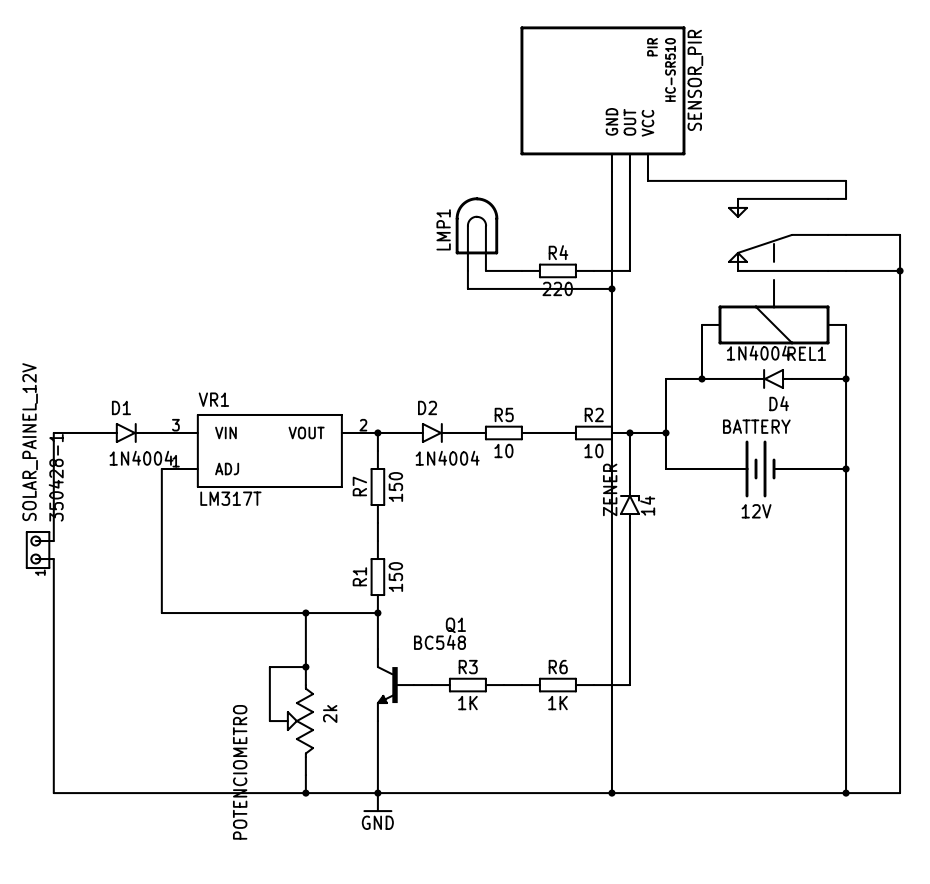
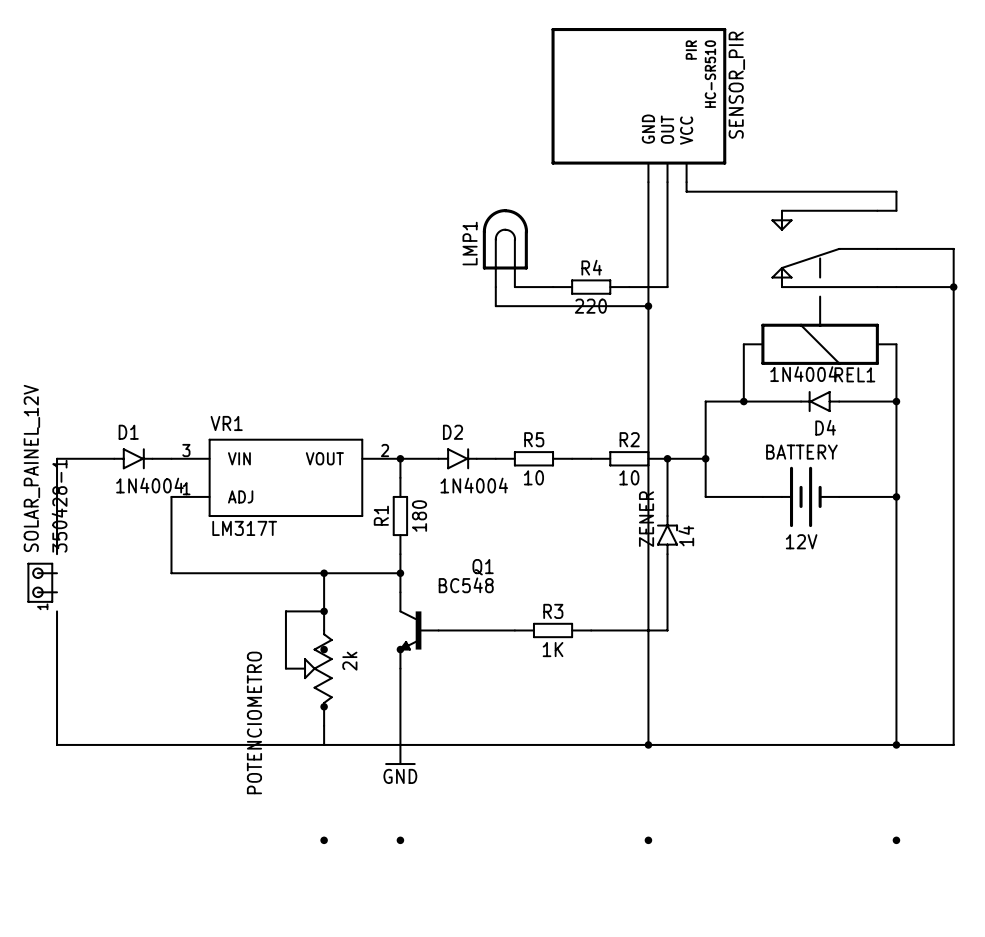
R7 name: R7 (359, 486) -> R1 (381, 515)
R7 value: 150 (395, 487) -> 180 (419, 516)
wire: (53, 523) (53, 541) -> none
wire: (161, 541) (161, 613) (377, 613) (377, 631) -> (171, 573) (400, 573) (400, 592)
wire: none -> (324, 573) (324, 611) (285, 611) (285, 668)
junction: none -> (324, 573)
junction: none -> (400, 573)
wire: (53, 559) (53, 577) -> none
junction: none -> (324, 611)
R1: 150 (377, 577) -> none
wire: none -> (438, 630) (514, 630)
wire: (629, 595) (629, 685) (593, 685) -> (667, 630) (591, 630)
wire: (305, 613) (305, 667) (269, 667) (269, 721) -> none
wire: none -> (400, 687) (400, 744)
Q1 position: (395, 685) -> (419, 630)
wire: (413, 685) (431, 685) -> none
R3 position: (467, 685) -> (553, 630)
wire: (503, 685) (521, 685) -> none
R6: 1K (557, 685) -> none
wire: (53, 703) (53, 793) (900, 793) (900, 703) -> (57, 744) (953, 744)
wire: (611, 703) (611, 793) -> none
junction: none -> (648, 744)
wire: (846, 703) (846, 793) -> none
junction: none -> (896, 744)
POTENCIOMETRO position: (291, 721) -> (309, 668)
wire: (377, 721) (377, 793) -> none
wire: (305, 775) (305, 793) -> (324, 725) (324, 744)
power symbol position: GND (377, 802) -> GND (400, 754)

